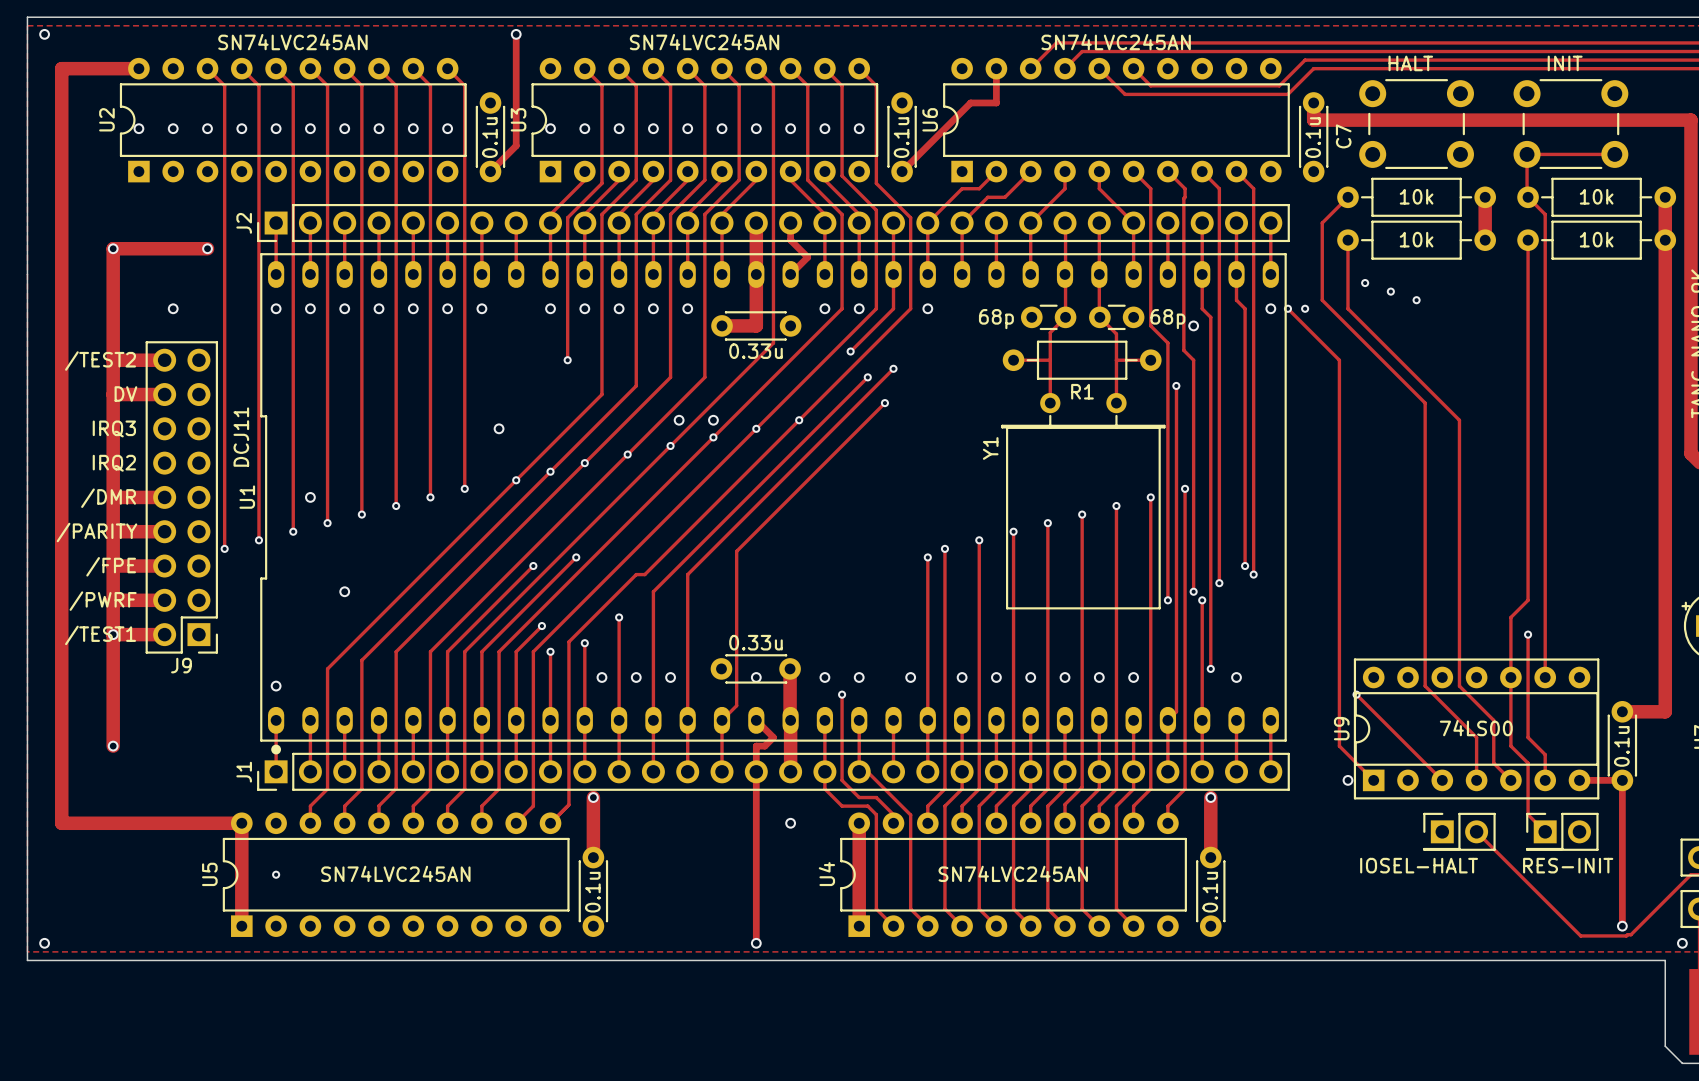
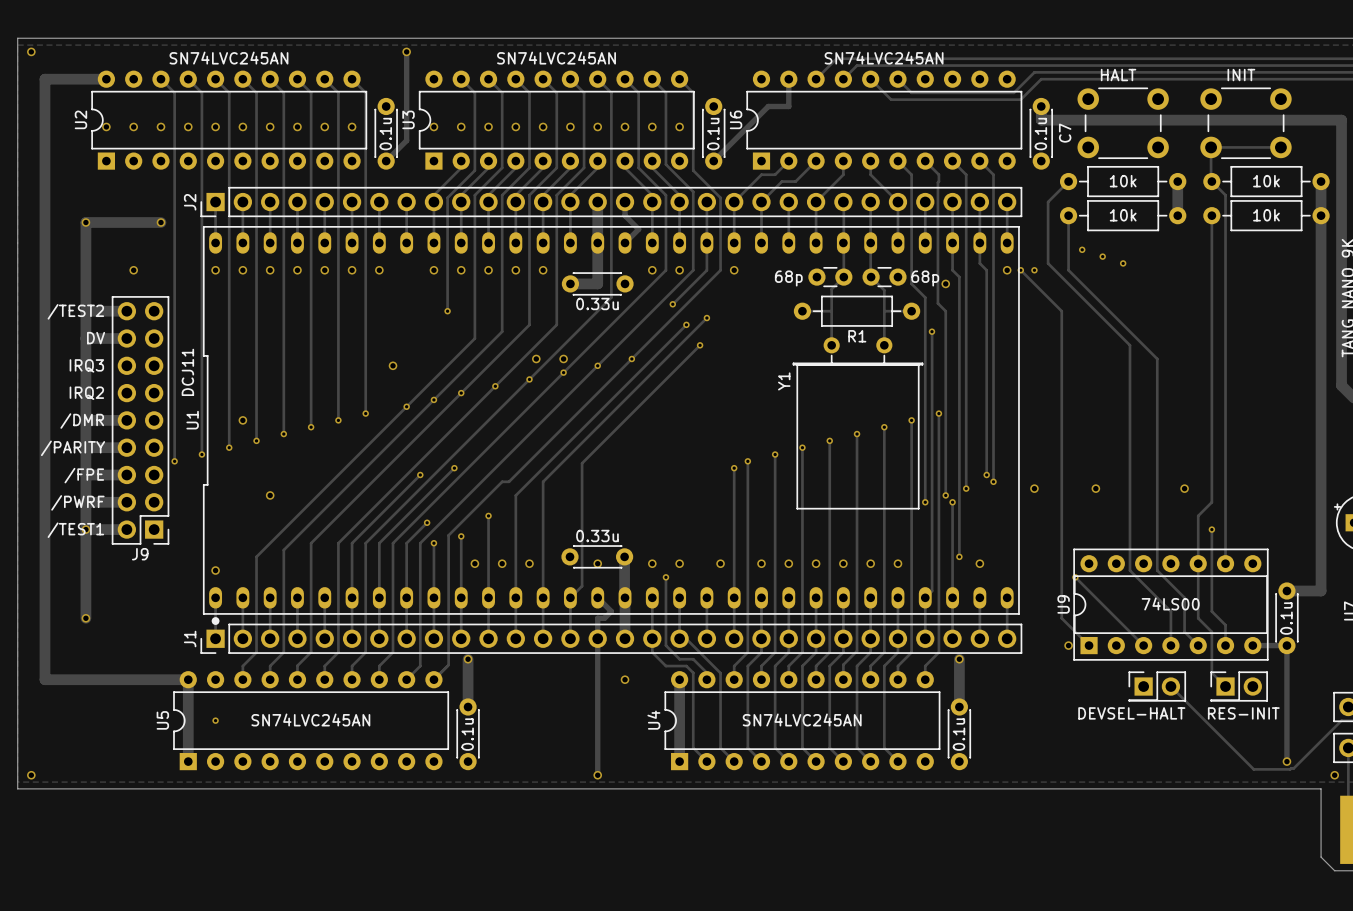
via: none -> (1034, 488)
via: none -> (1095, 488)
via: none -> (1184, 488)
part value: IOSEL-HALT (1419, 865) -> DEVSEL-HALT (1131, 713)

